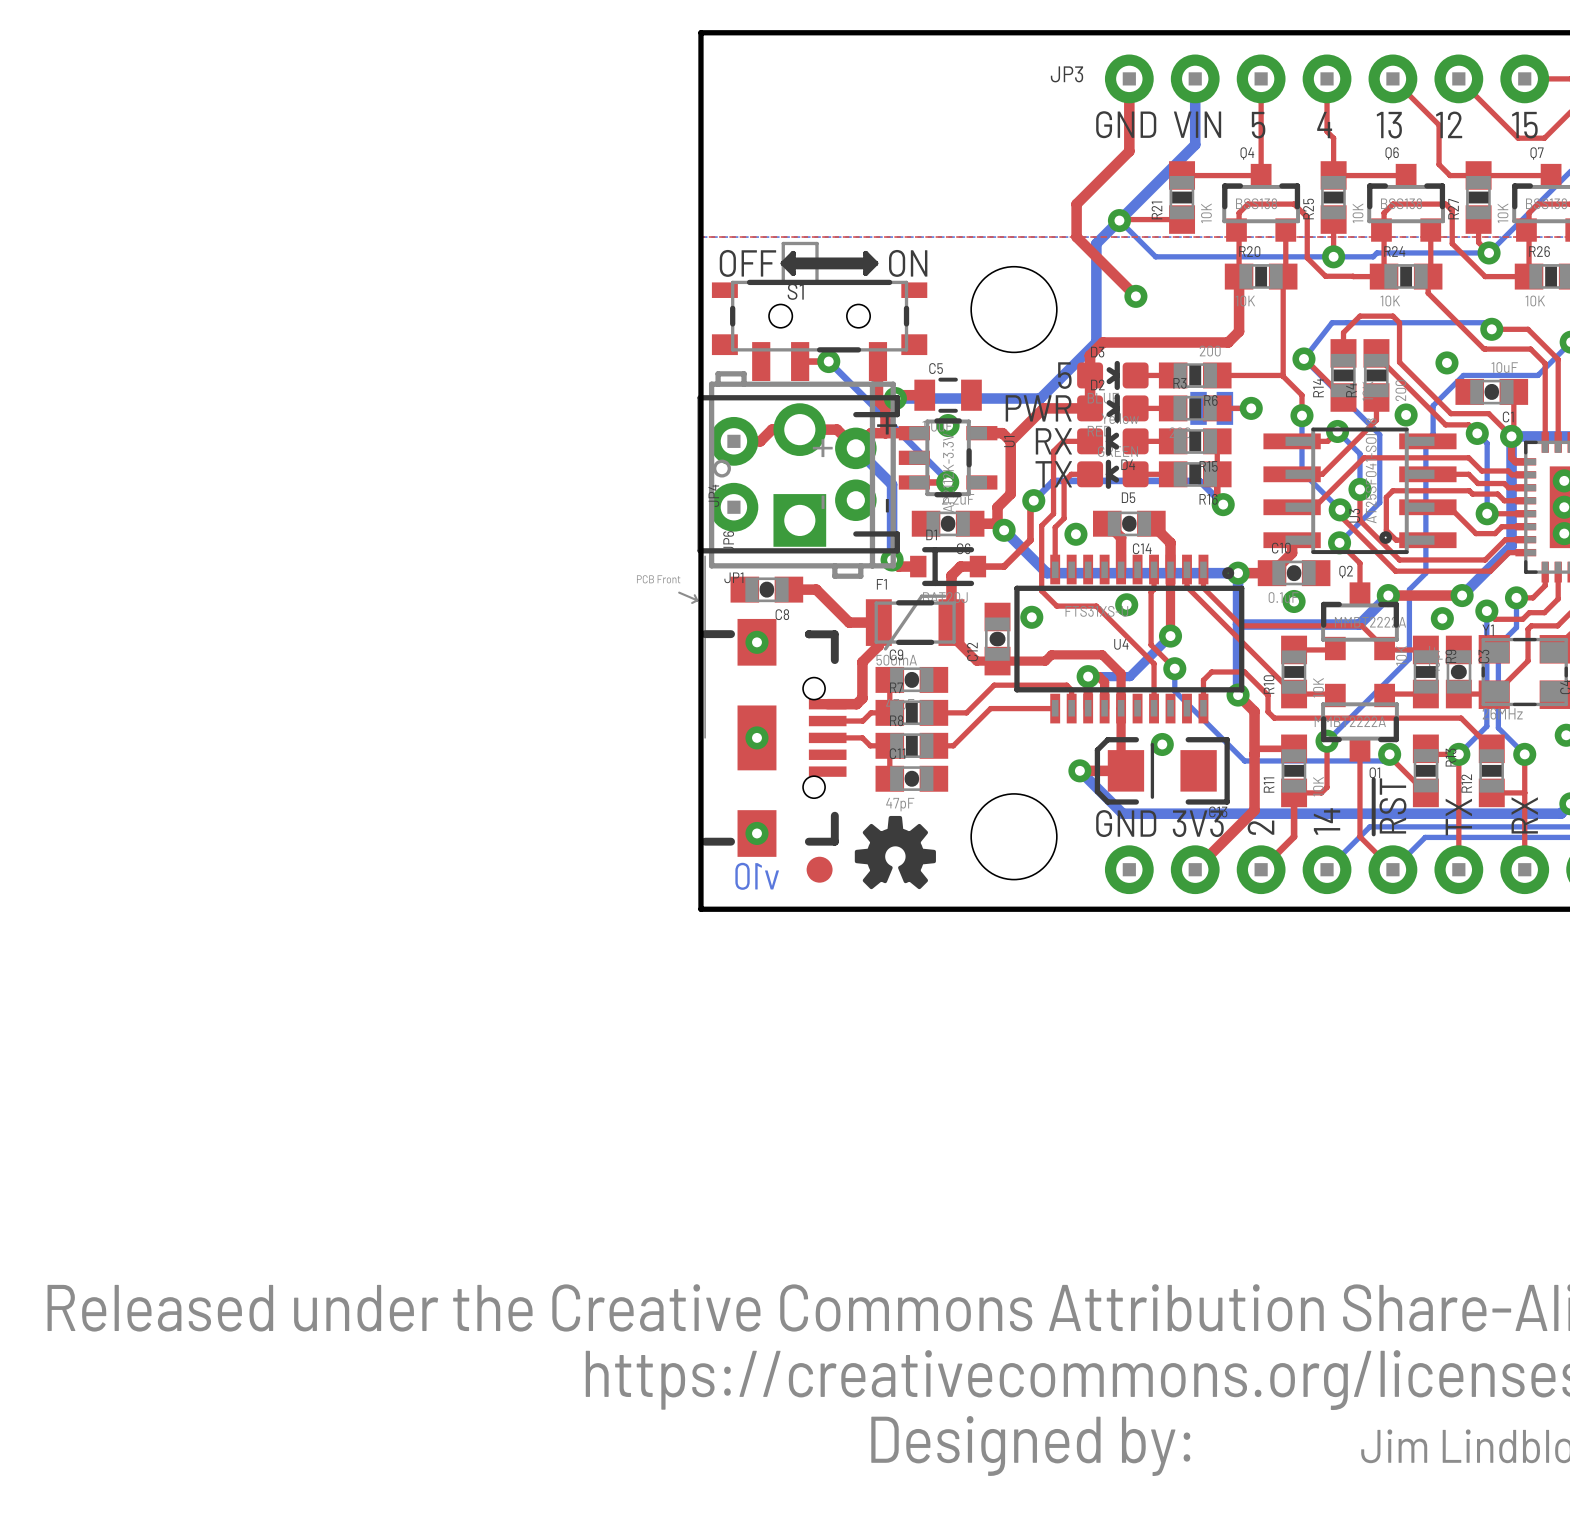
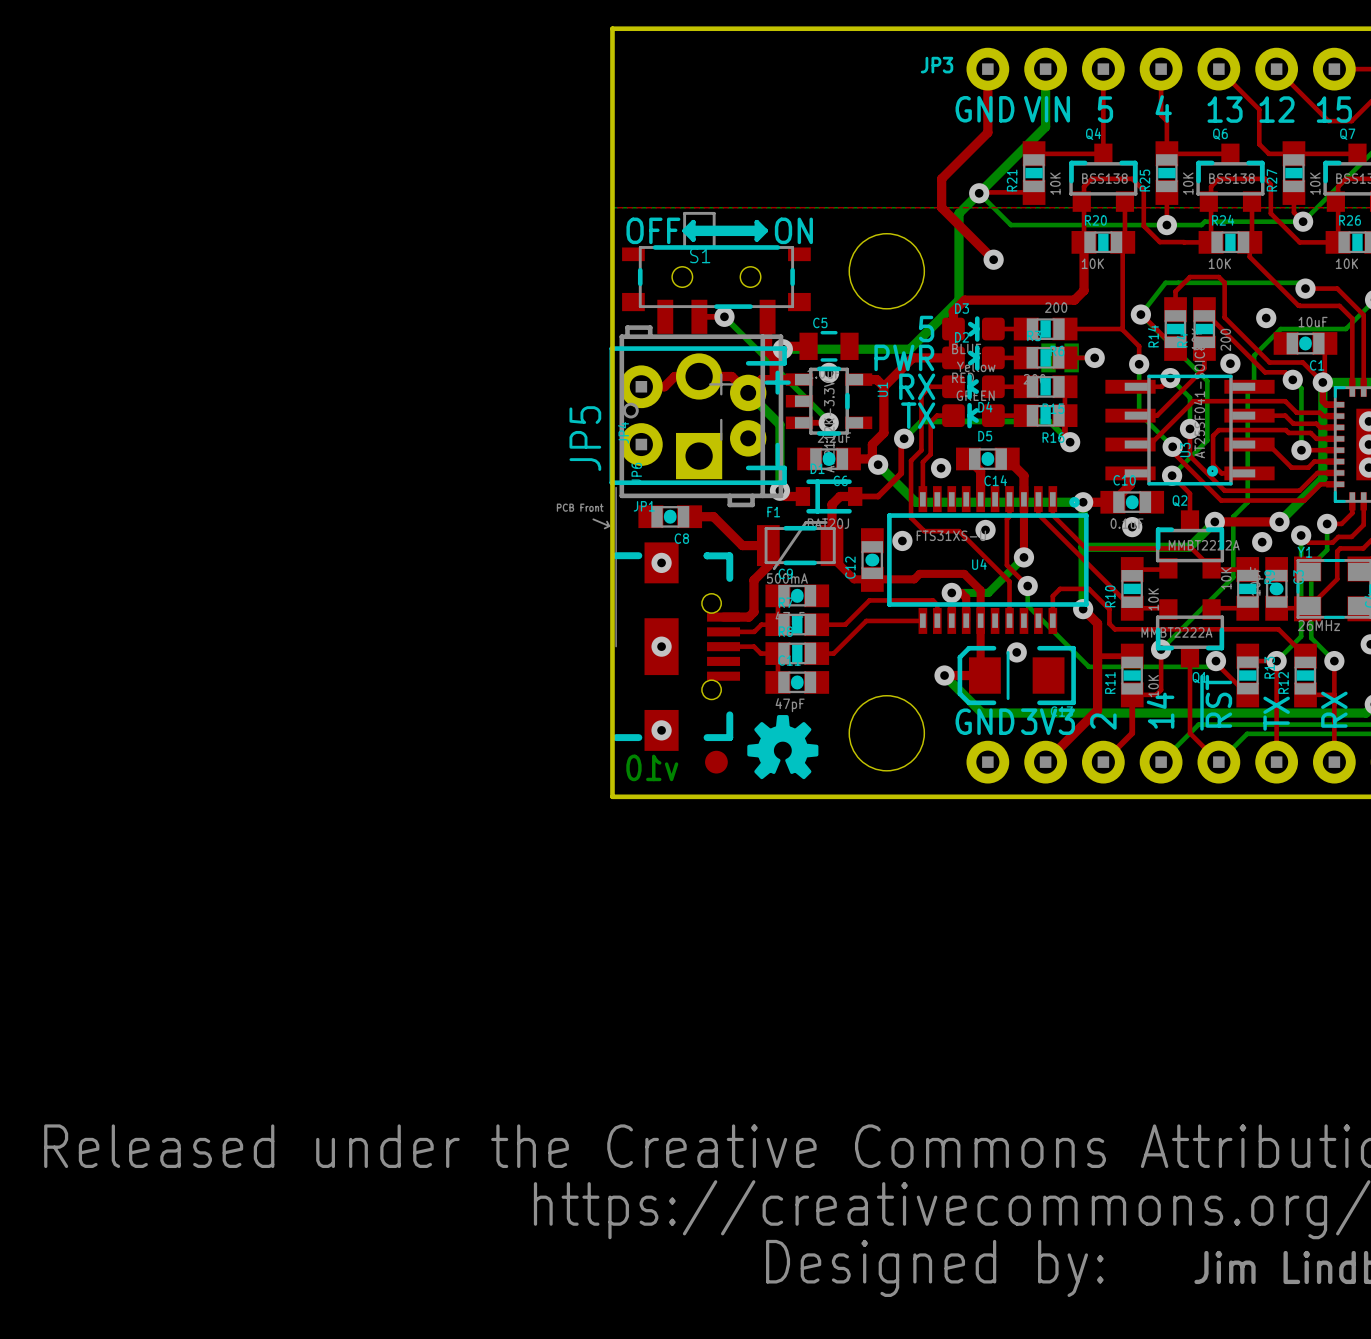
JP5 name: none -> JP5 (585, 438)

